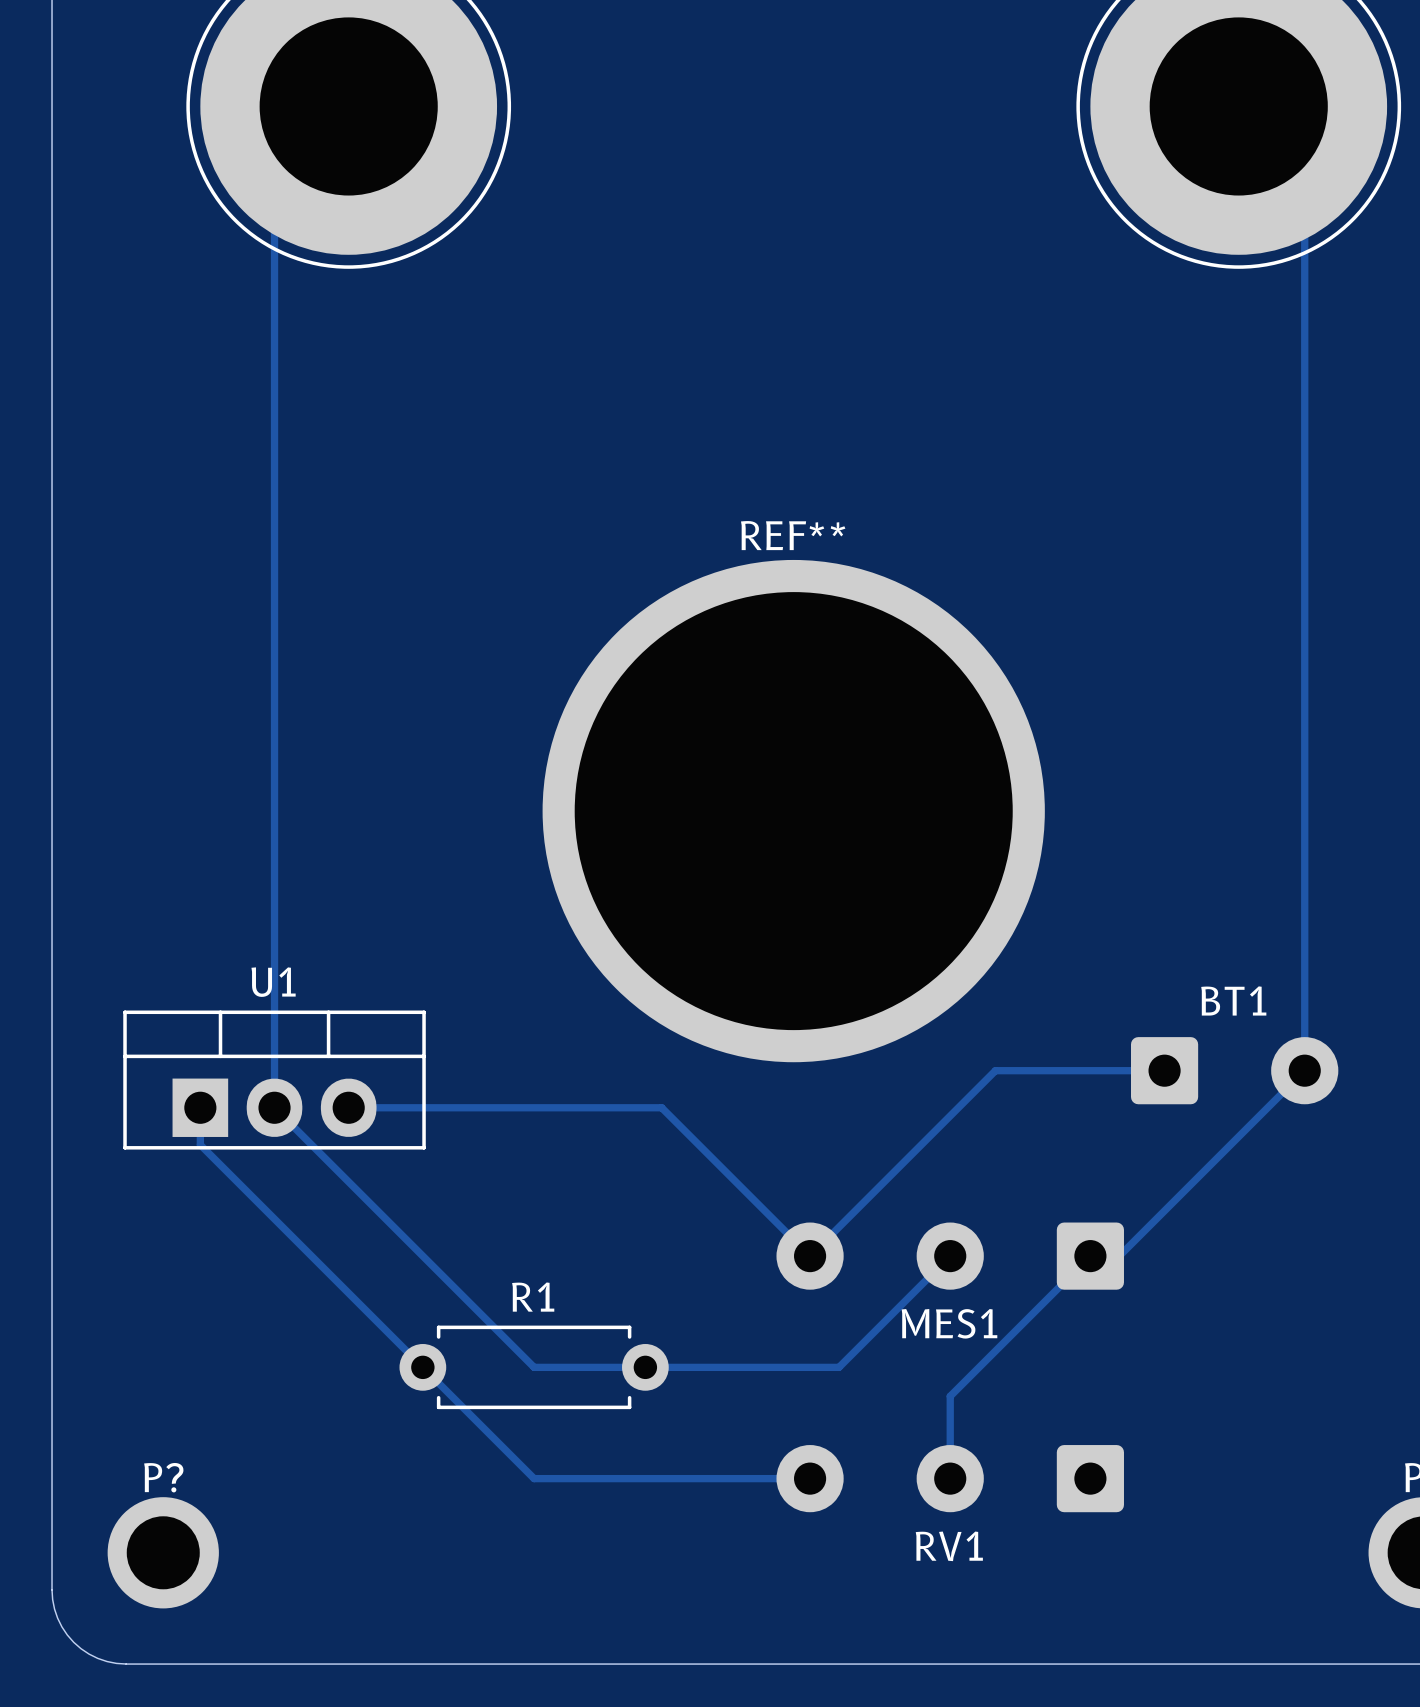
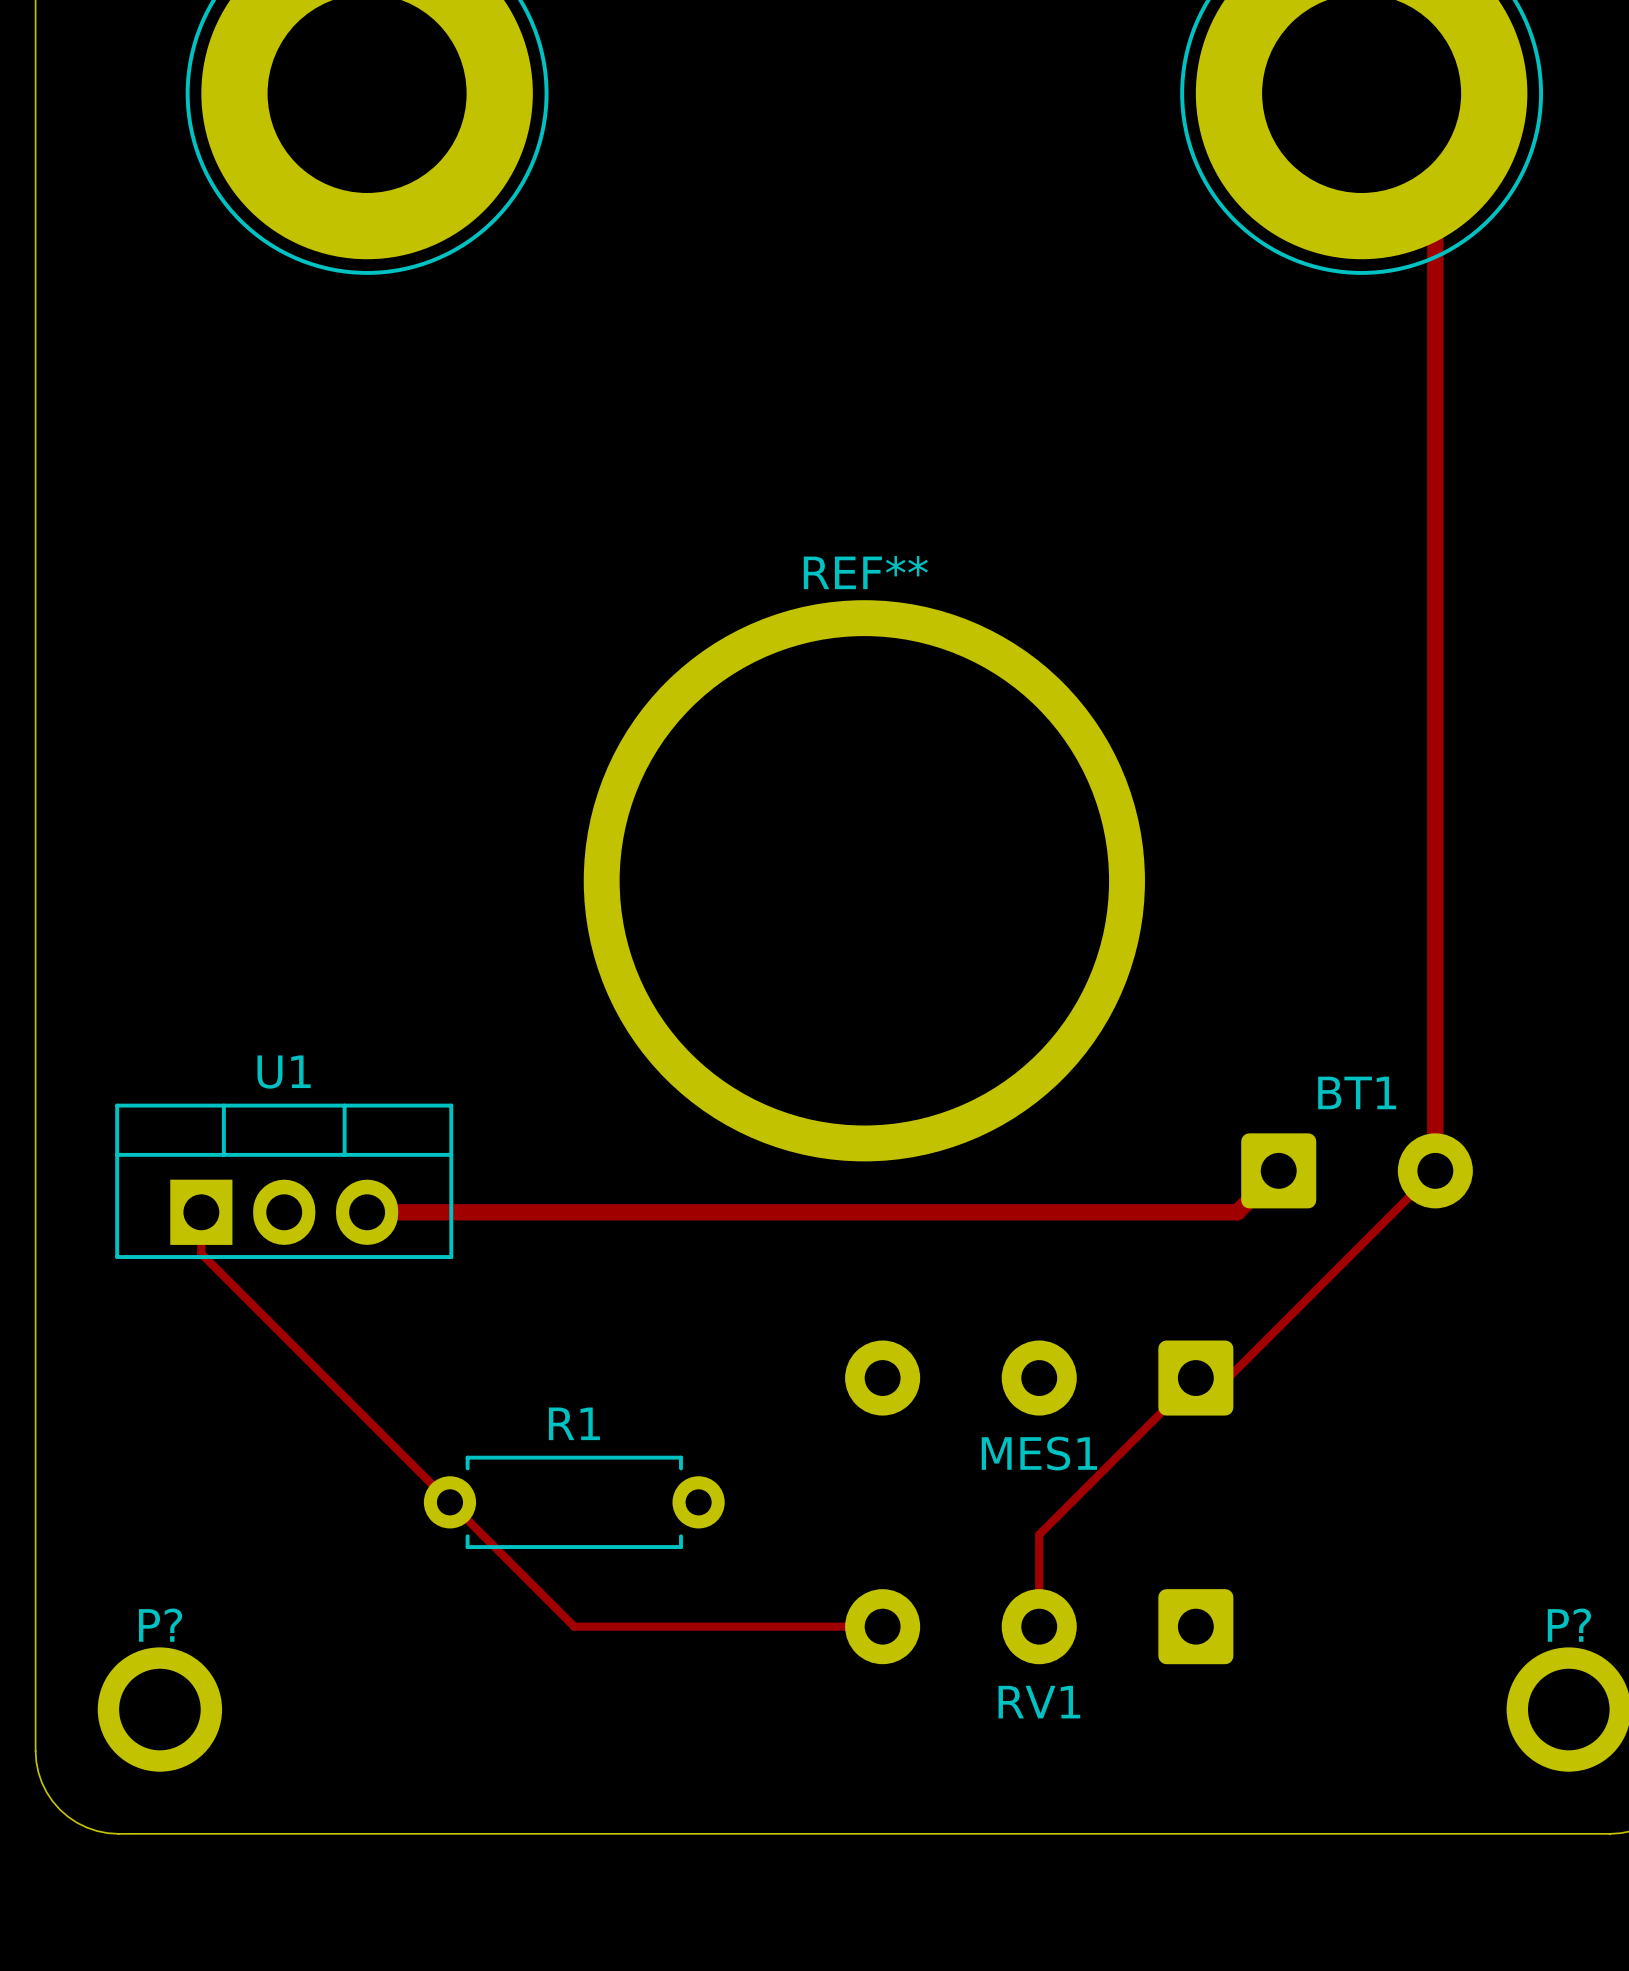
track width: thin (1304, 172) (1304, 1070) -> thick (1435, 167) (1435, 1170)
track: (274, 180) (274, 1107) (534, 1367) (838, 1367) (950, 1256) -> none
track: (1164, 1070) (995, 1070) (810, 1256) (661, 1107) -> (1278, 1170) (1237, 1212) (716, 1212)
track width: thin (348, 1107) (661, 1107) -> thick (367, 1212) (716, 1212)

